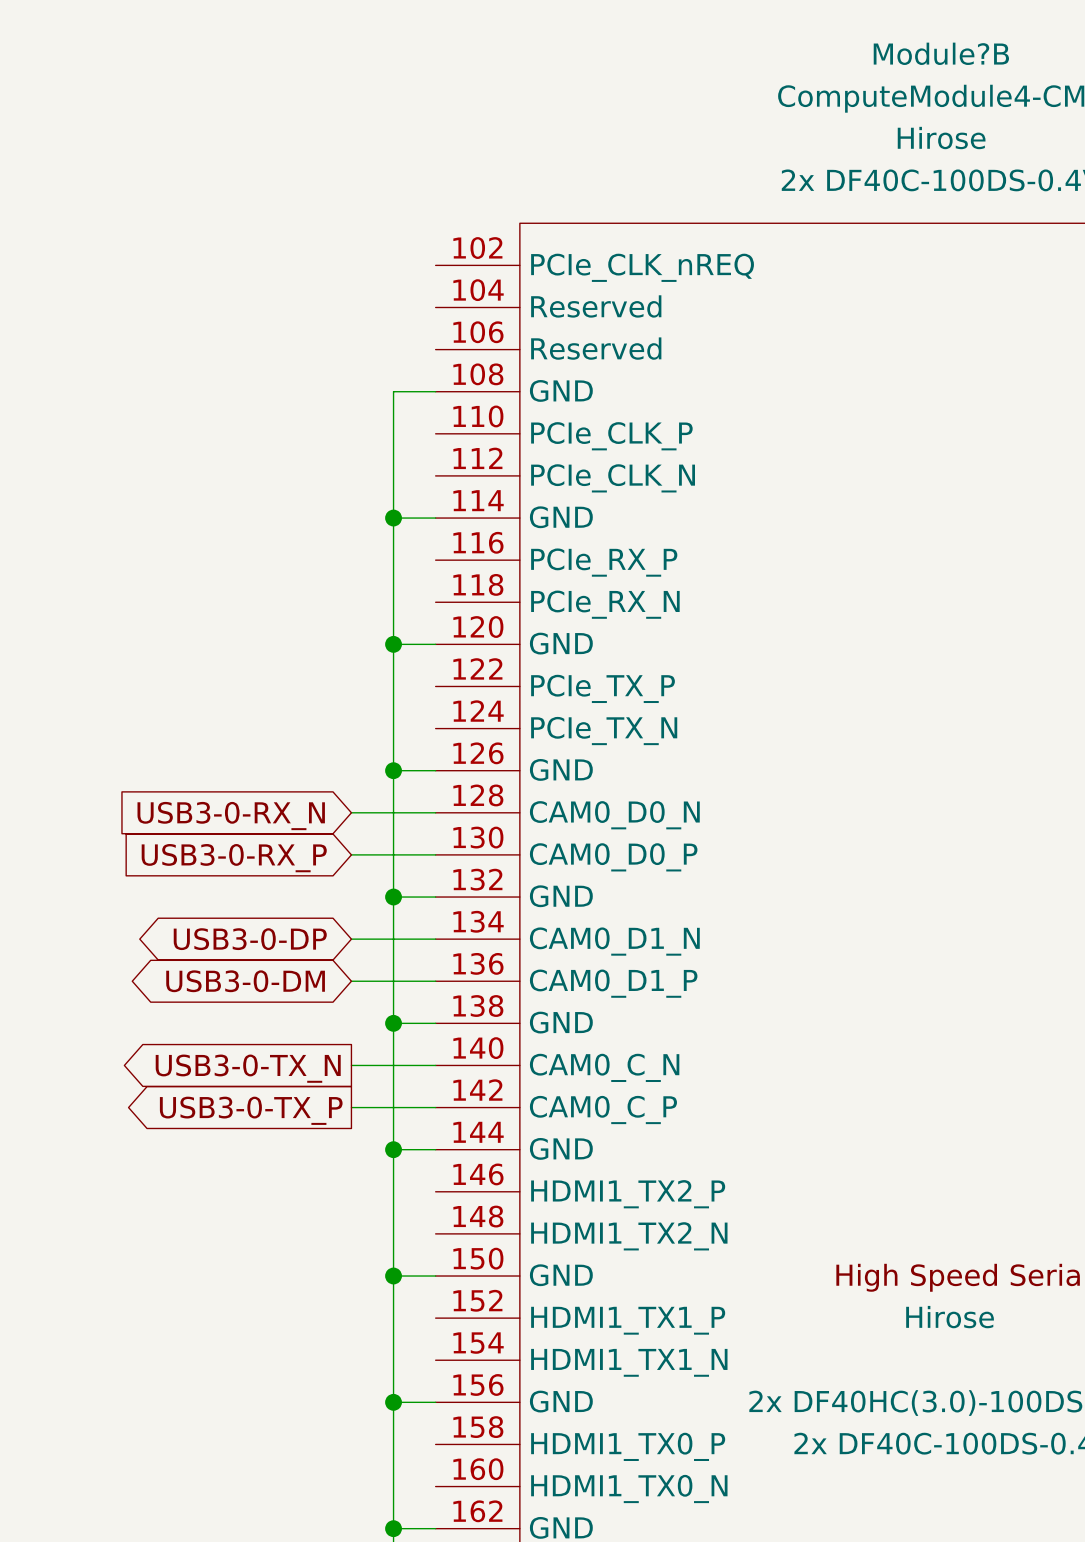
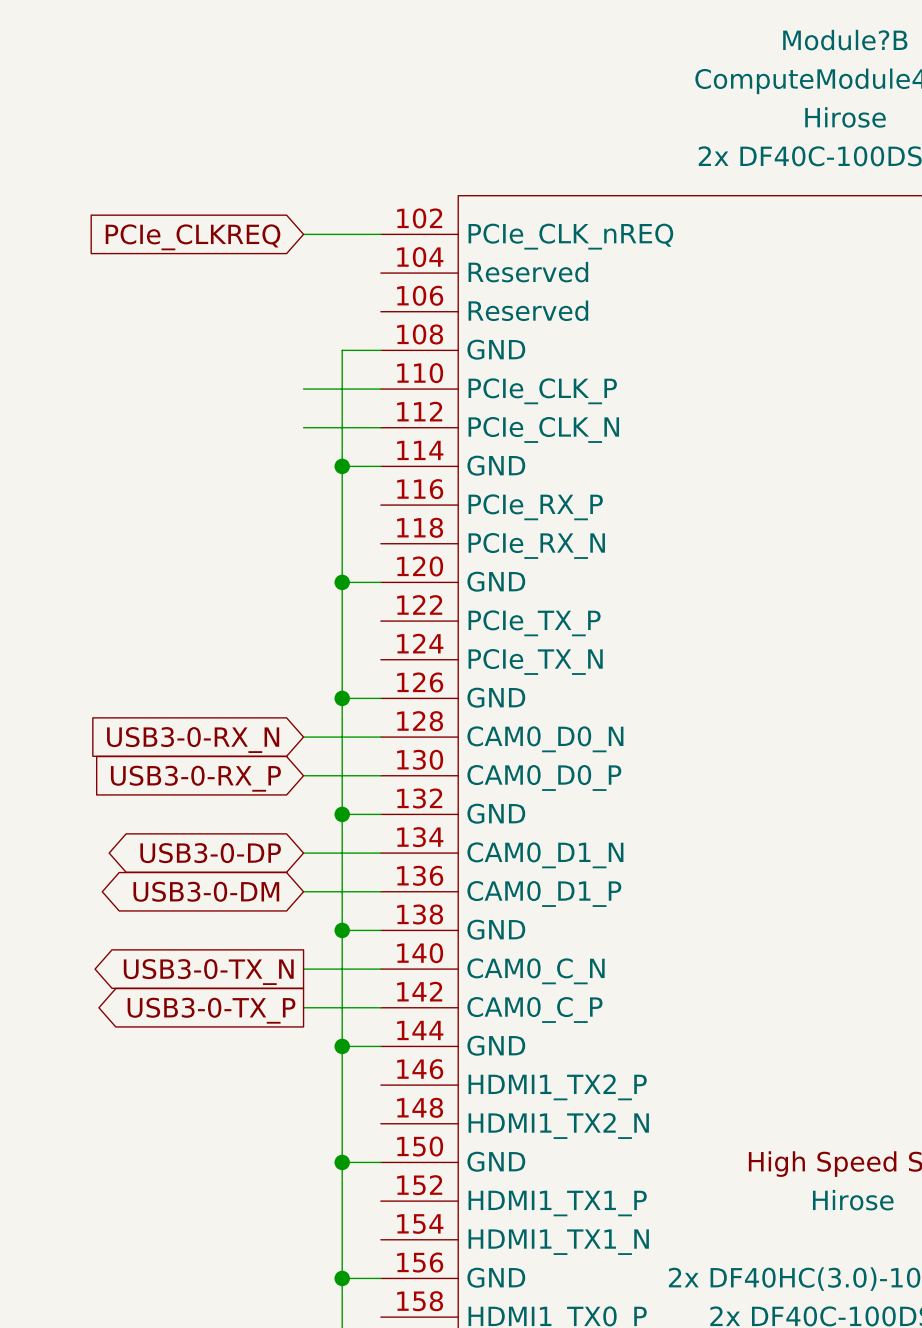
wire: none -> (303, 234) (380, 234)
global label: none -> PCIe_CLKREQ (193, 237)
wire: none -> (303, 389) (380, 389)
wire: none -> (303, 427) (380, 427)

